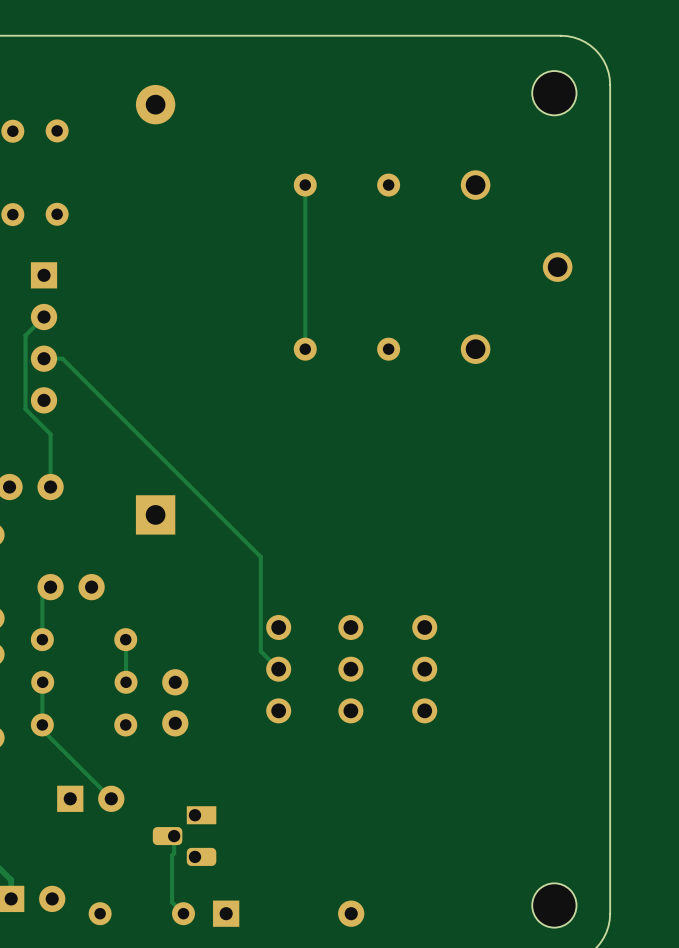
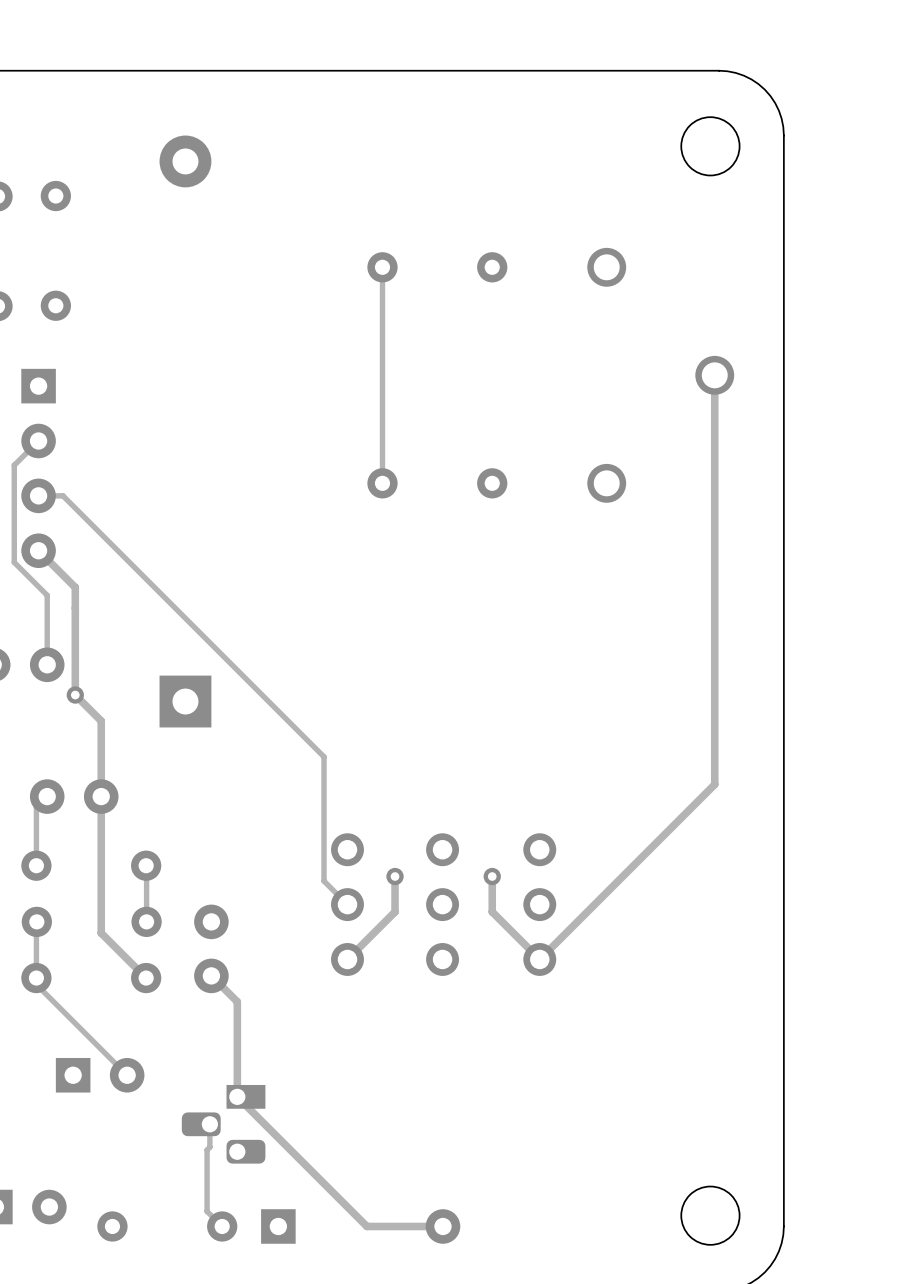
track: none -> (714, 375) (714, 784) (539, 959) (492, 911) (492, 876)
track: none -> (38, 550) (75, 587) (75, 695) (101, 720) (101, 933) (146, 978)
via: none -> (75, 695)
track: none -> (395, 876) (395, 911) (347, 959)
via: none -> (395, 876)
via: none -> (492, 876)
track: none -> (211, 975) (237, 1001) (237, 1096) (366, 1226) (442, 1226)

